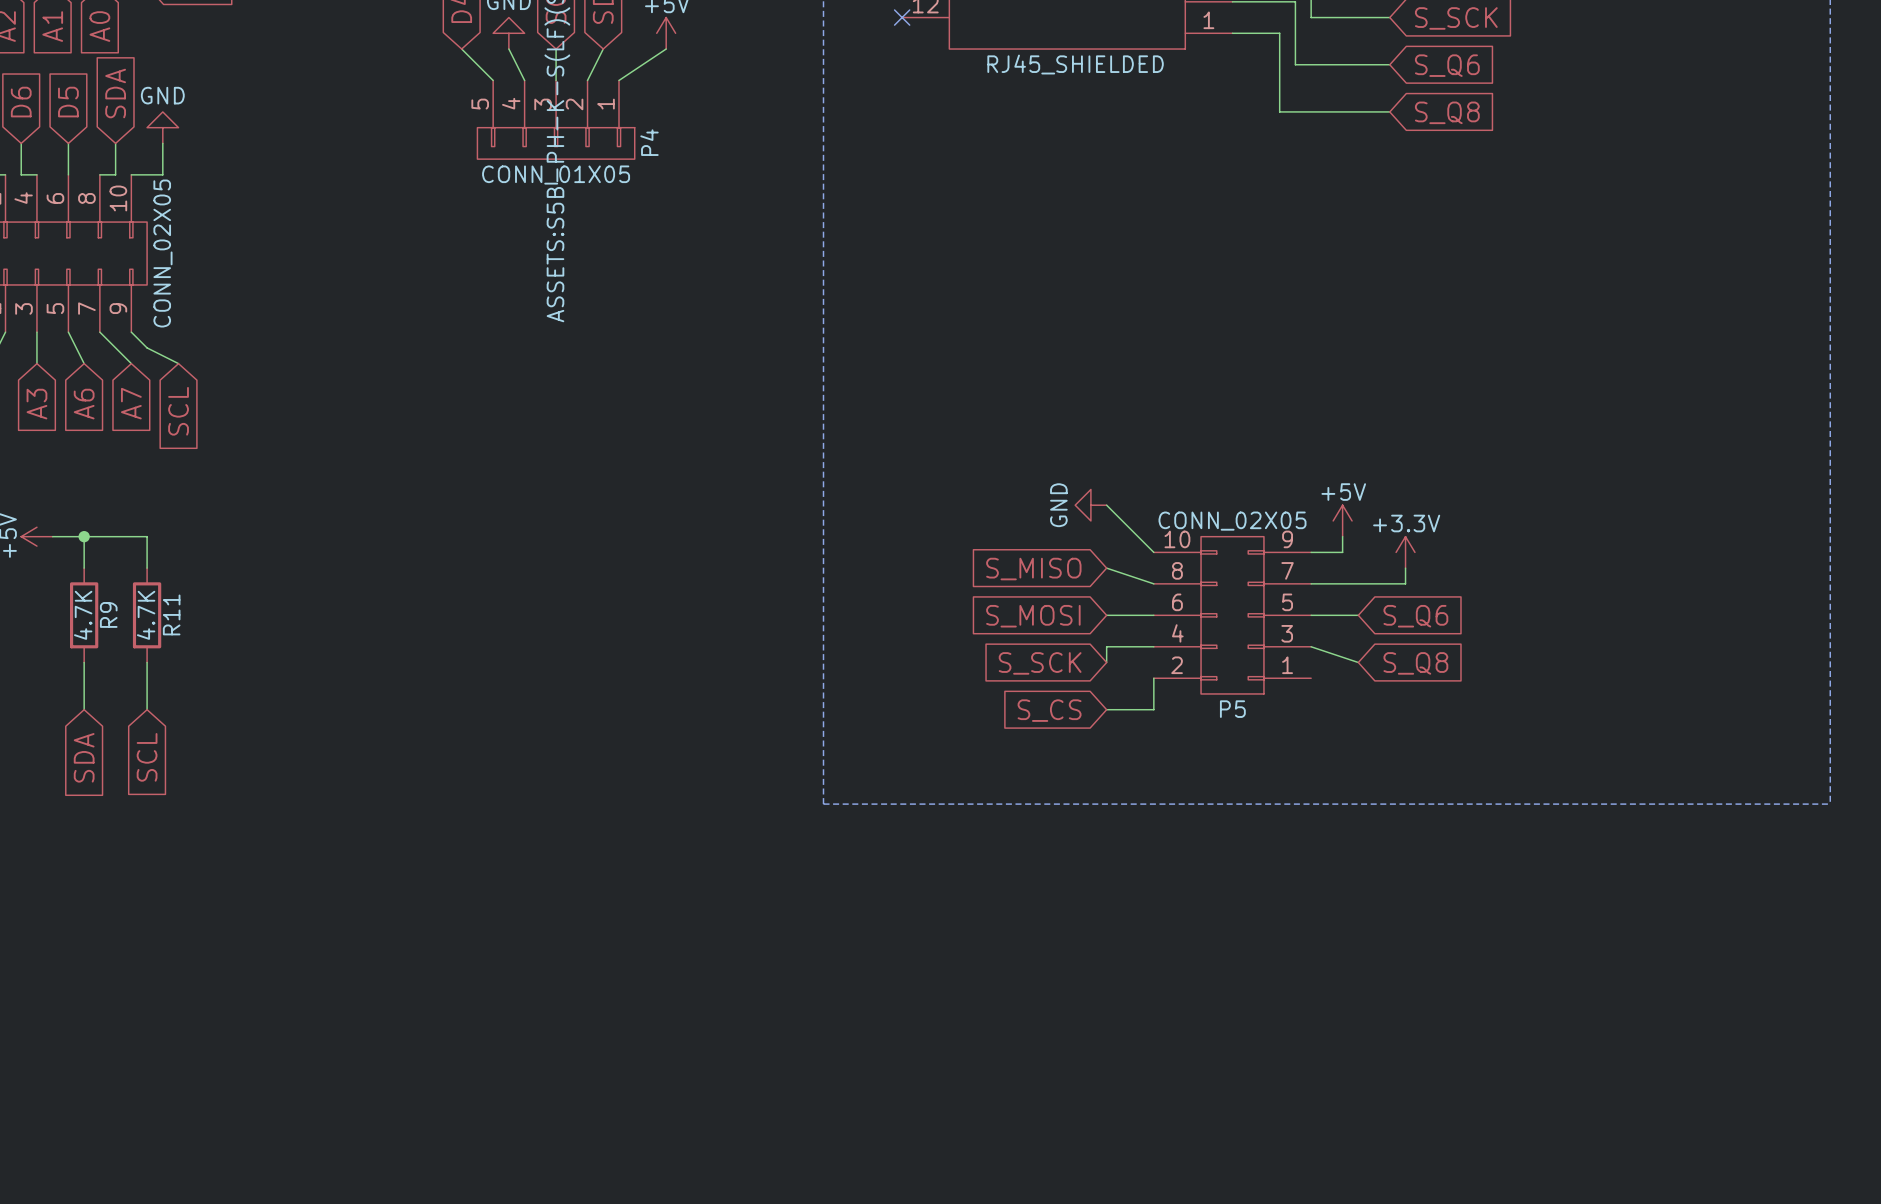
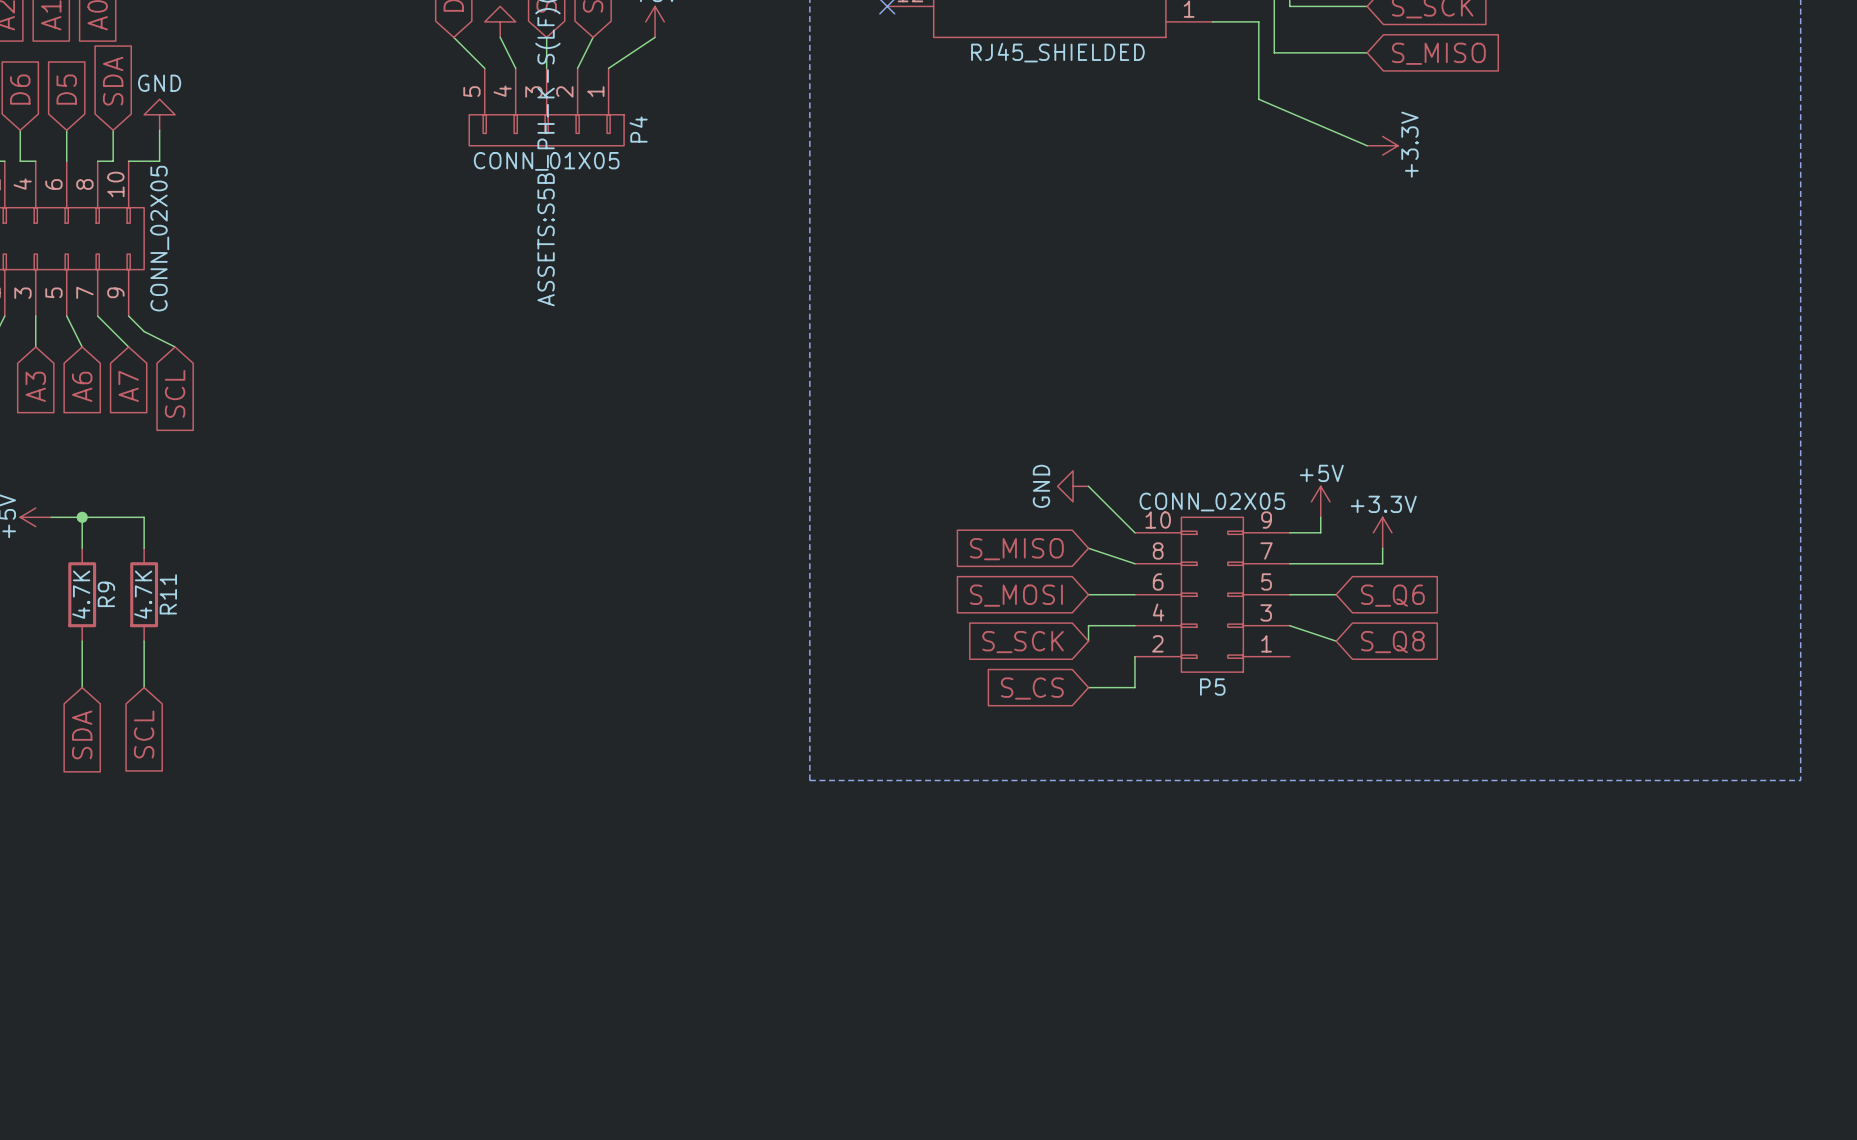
global label: S_Q6 (1447, 65) -> S_MISO (1438, 53)
wire: (1279, 111) (1389, 111) -> (1258, 99) (1367, 145)
global label: S_Q8 (1447, 112) -> none
power symbol: none -> +3.3V (1382, 145)

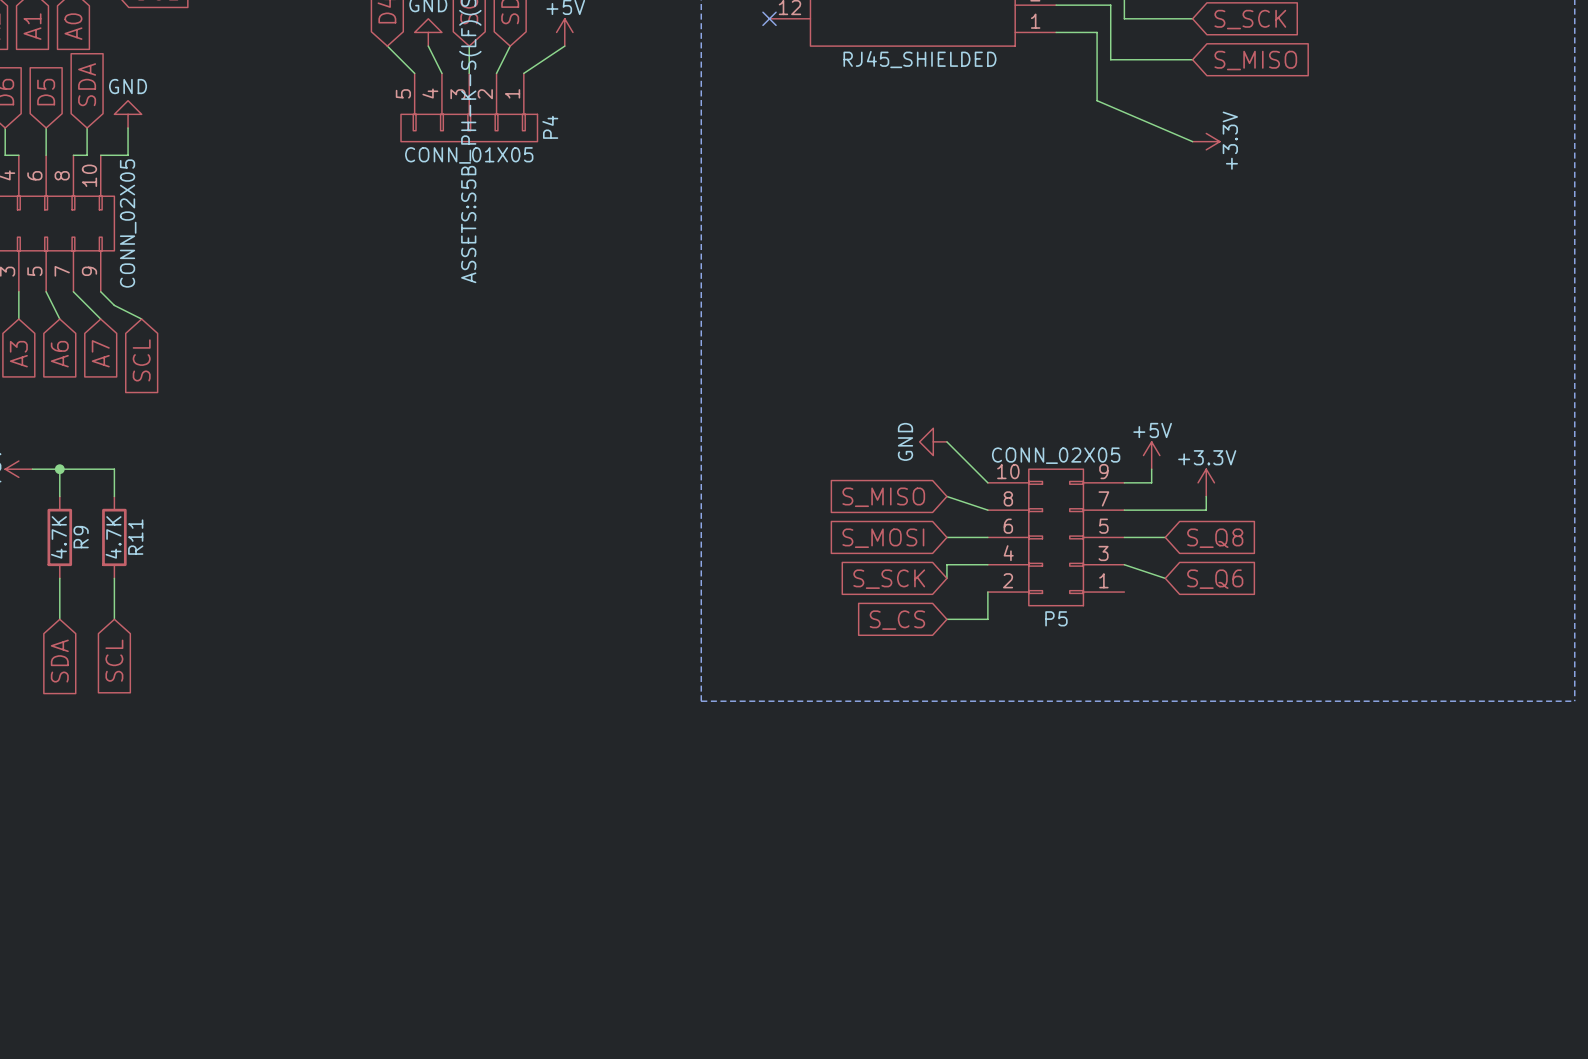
global label: S_Q6 (1392, 595) -> S_Q8 (1215, 538)
global label: S_Q8 (1392, 642) -> S_Q6 (1215, 579)

